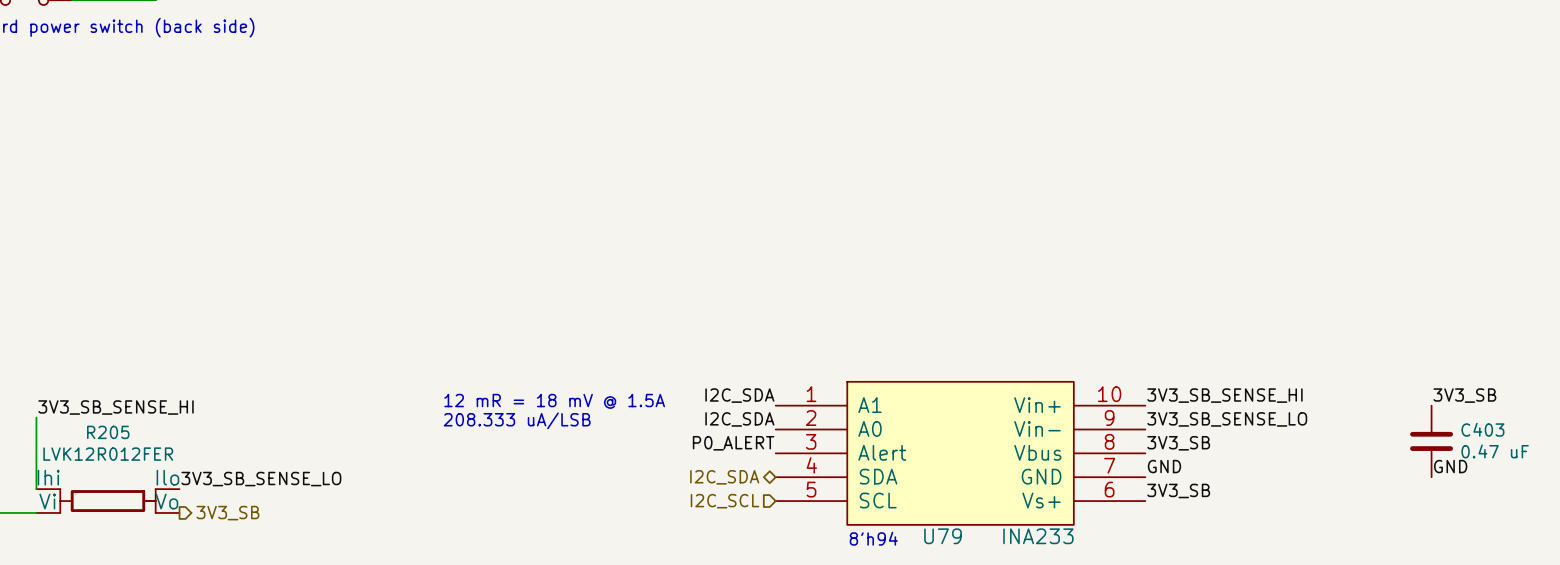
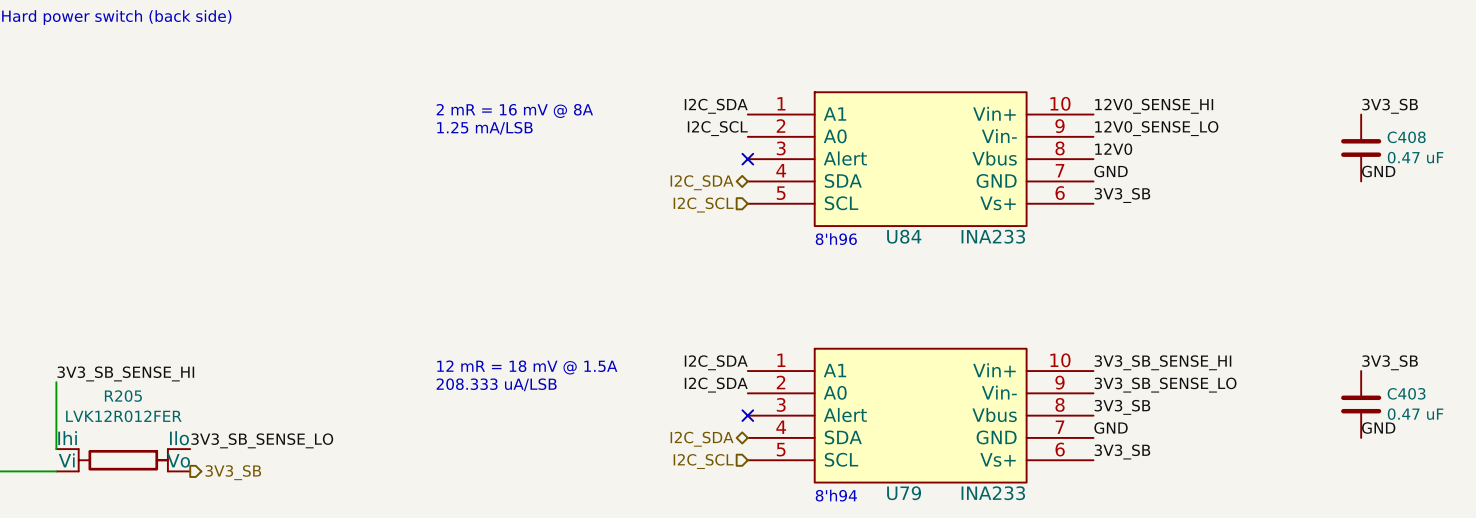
label: none -> I2C_SDA (716, 106)
label: none -> 12V0_SENSE_HI (1154, 106)
label: none -> 3V3_SB (1390, 106)
text: none -> 2 mR = 16 mV @ 8A (514, 110)
label: none -> I2C_SCL (717, 128)
label: none -> 12V0_SENSE_LO (1156, 128)
text: none -> 1.25 mA/LSB (484, 128)
C408: none -> 0.47 uF (1361, 148)
label: none -> 12V0 (1113, 149)
no-connect mark: none -> (747, 159)
U84: none -> INA233 (920, 159)
label: none -> GND (1111, 171)
label: none -> GND (1378, 171)
hierarchical label: none -> I2C_SDA (702, 182)
label: none -> 3V3_SB (1122, 195)
hierarchical label: none -> I2C_SCL (703, 205)
text: none -> 8'h96 (836, 239)
label: P0_ALERT (733, 443) -> none
no-connect mark: none -> (747, 415)

